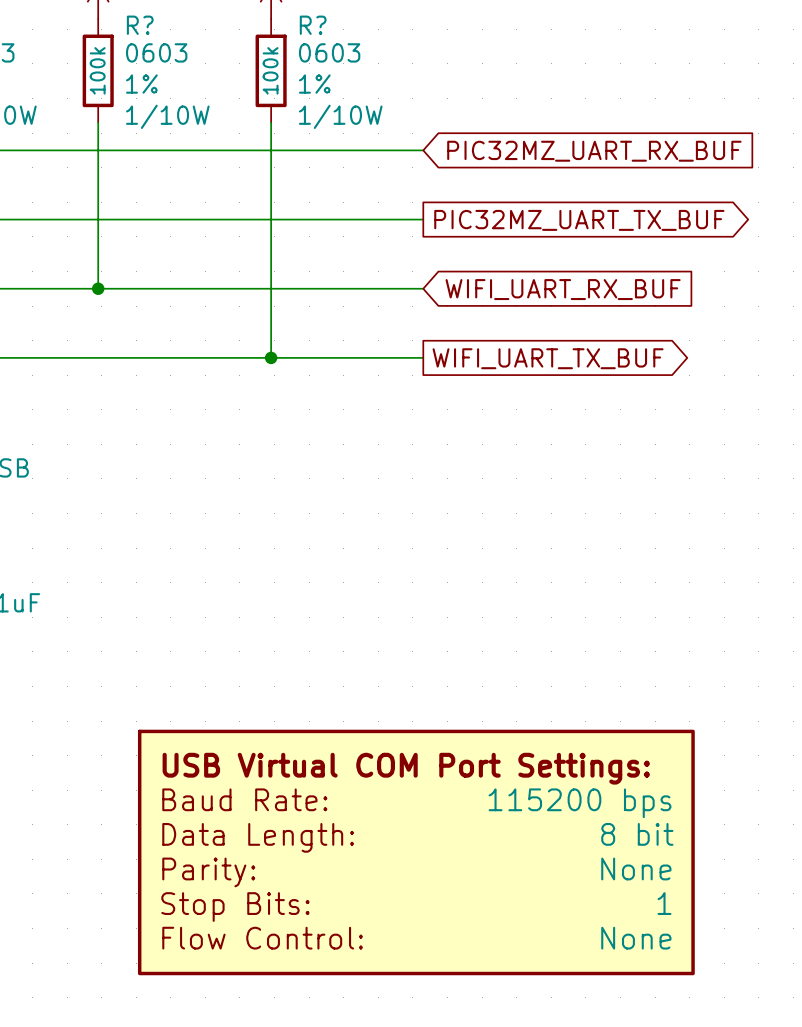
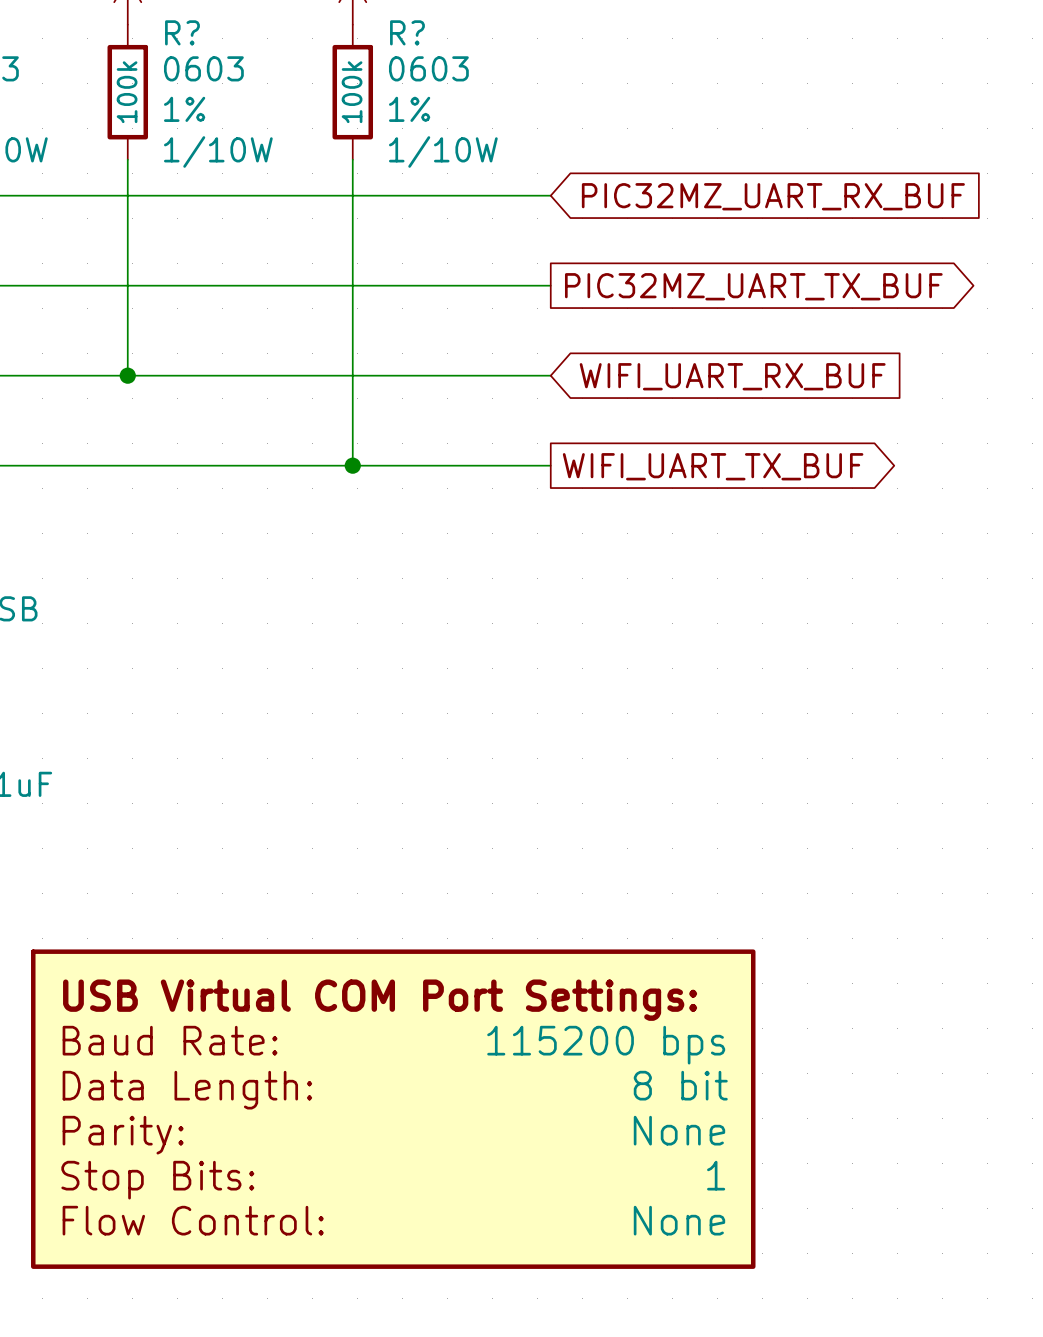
part position: (416, 852) -> (393, 1109)

